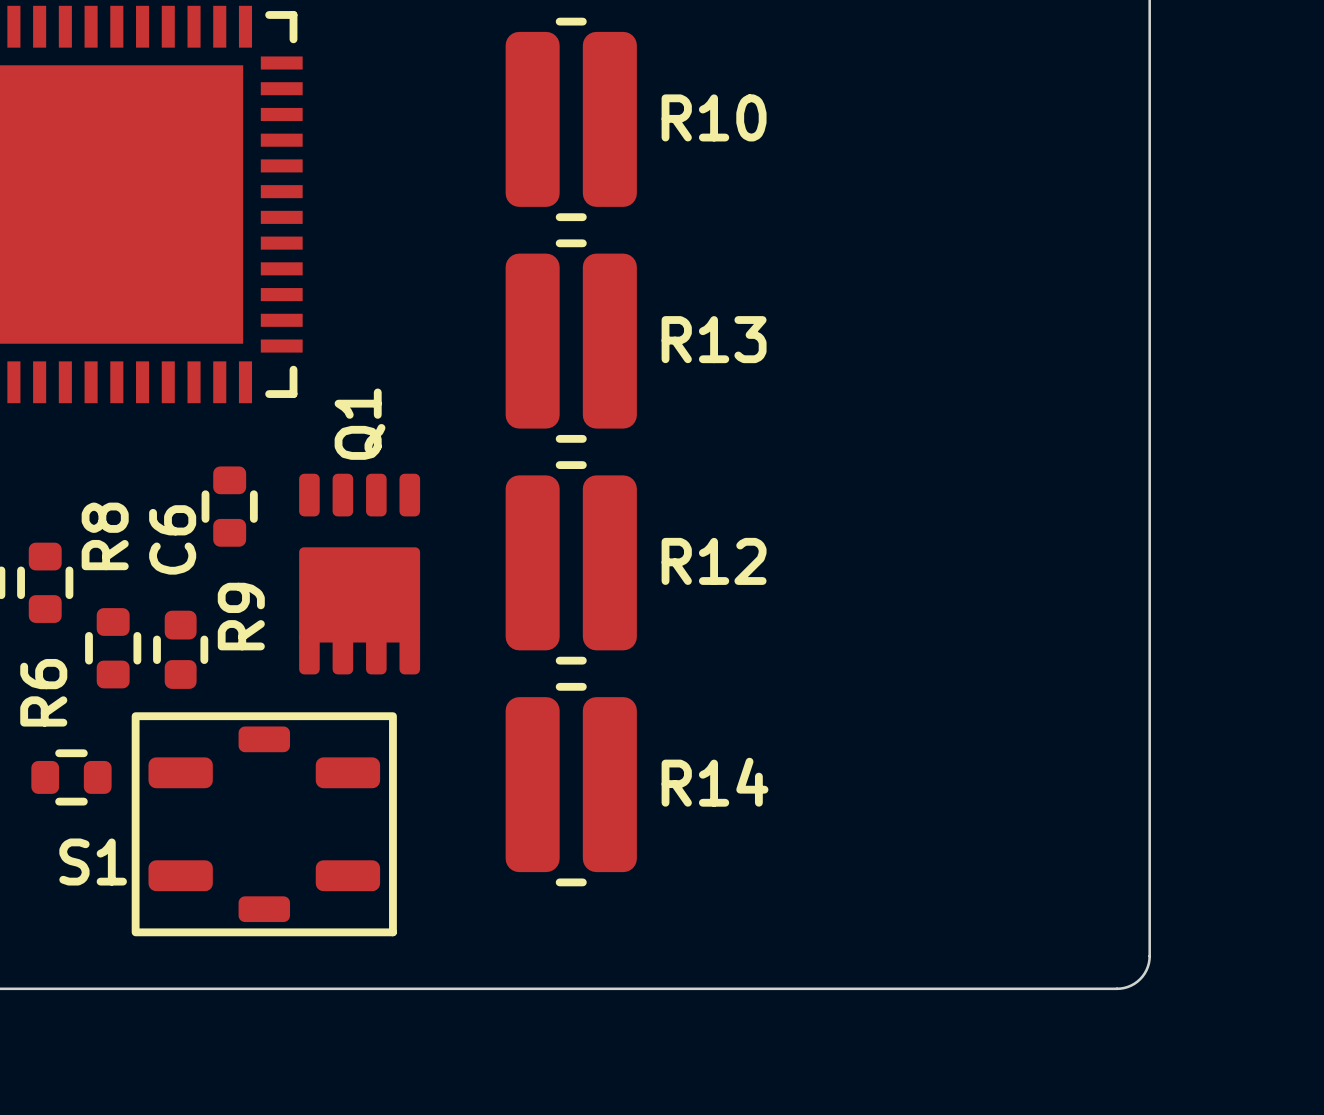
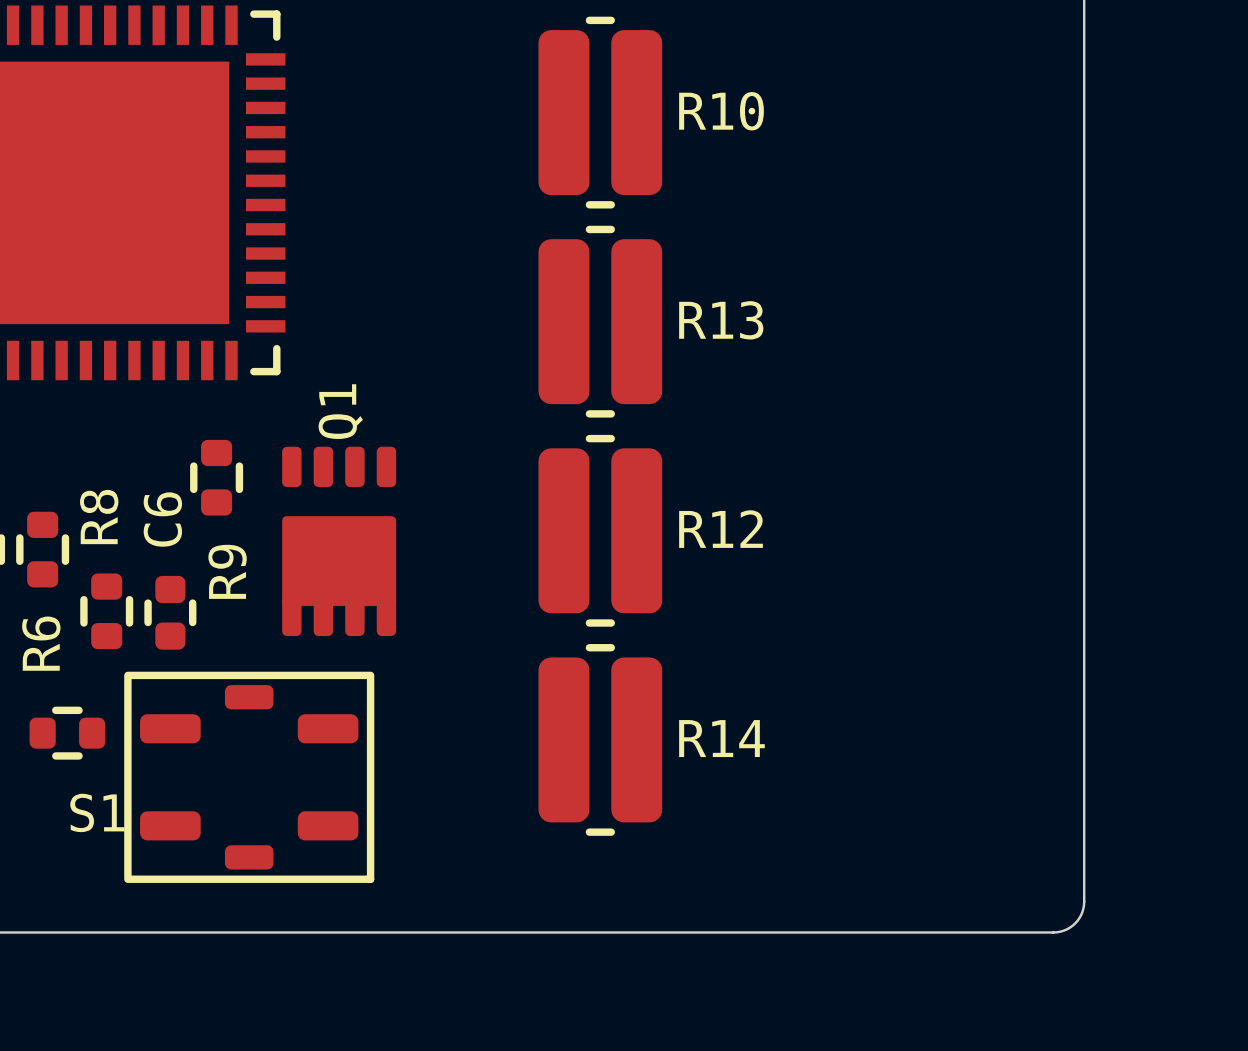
R10 position: (571, 119) -> (600, 112)
R13 position: (571, 341) -> (600, 321)
R12 position: (571, 562) -> (600, 530)
R14 position: (571, 784) -> (600, 739)

